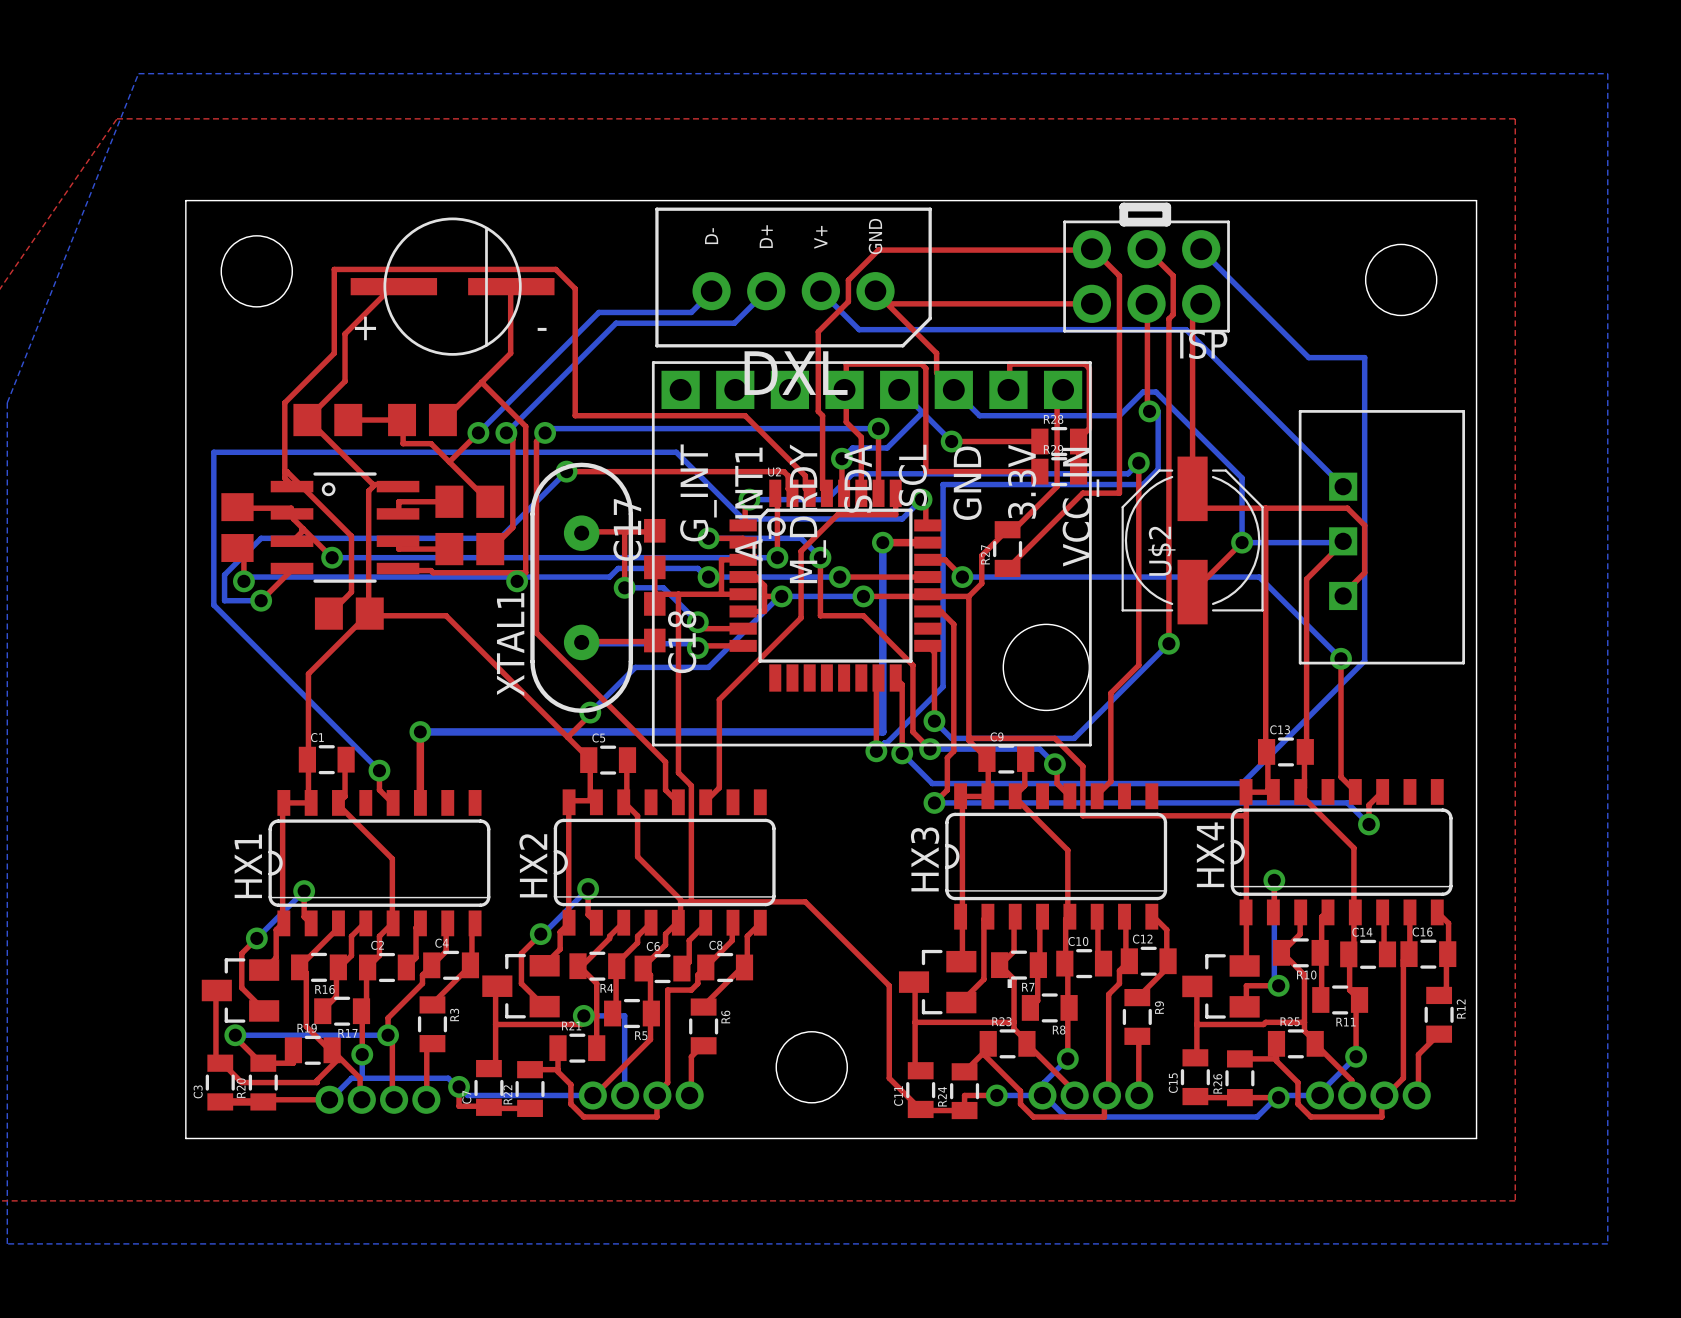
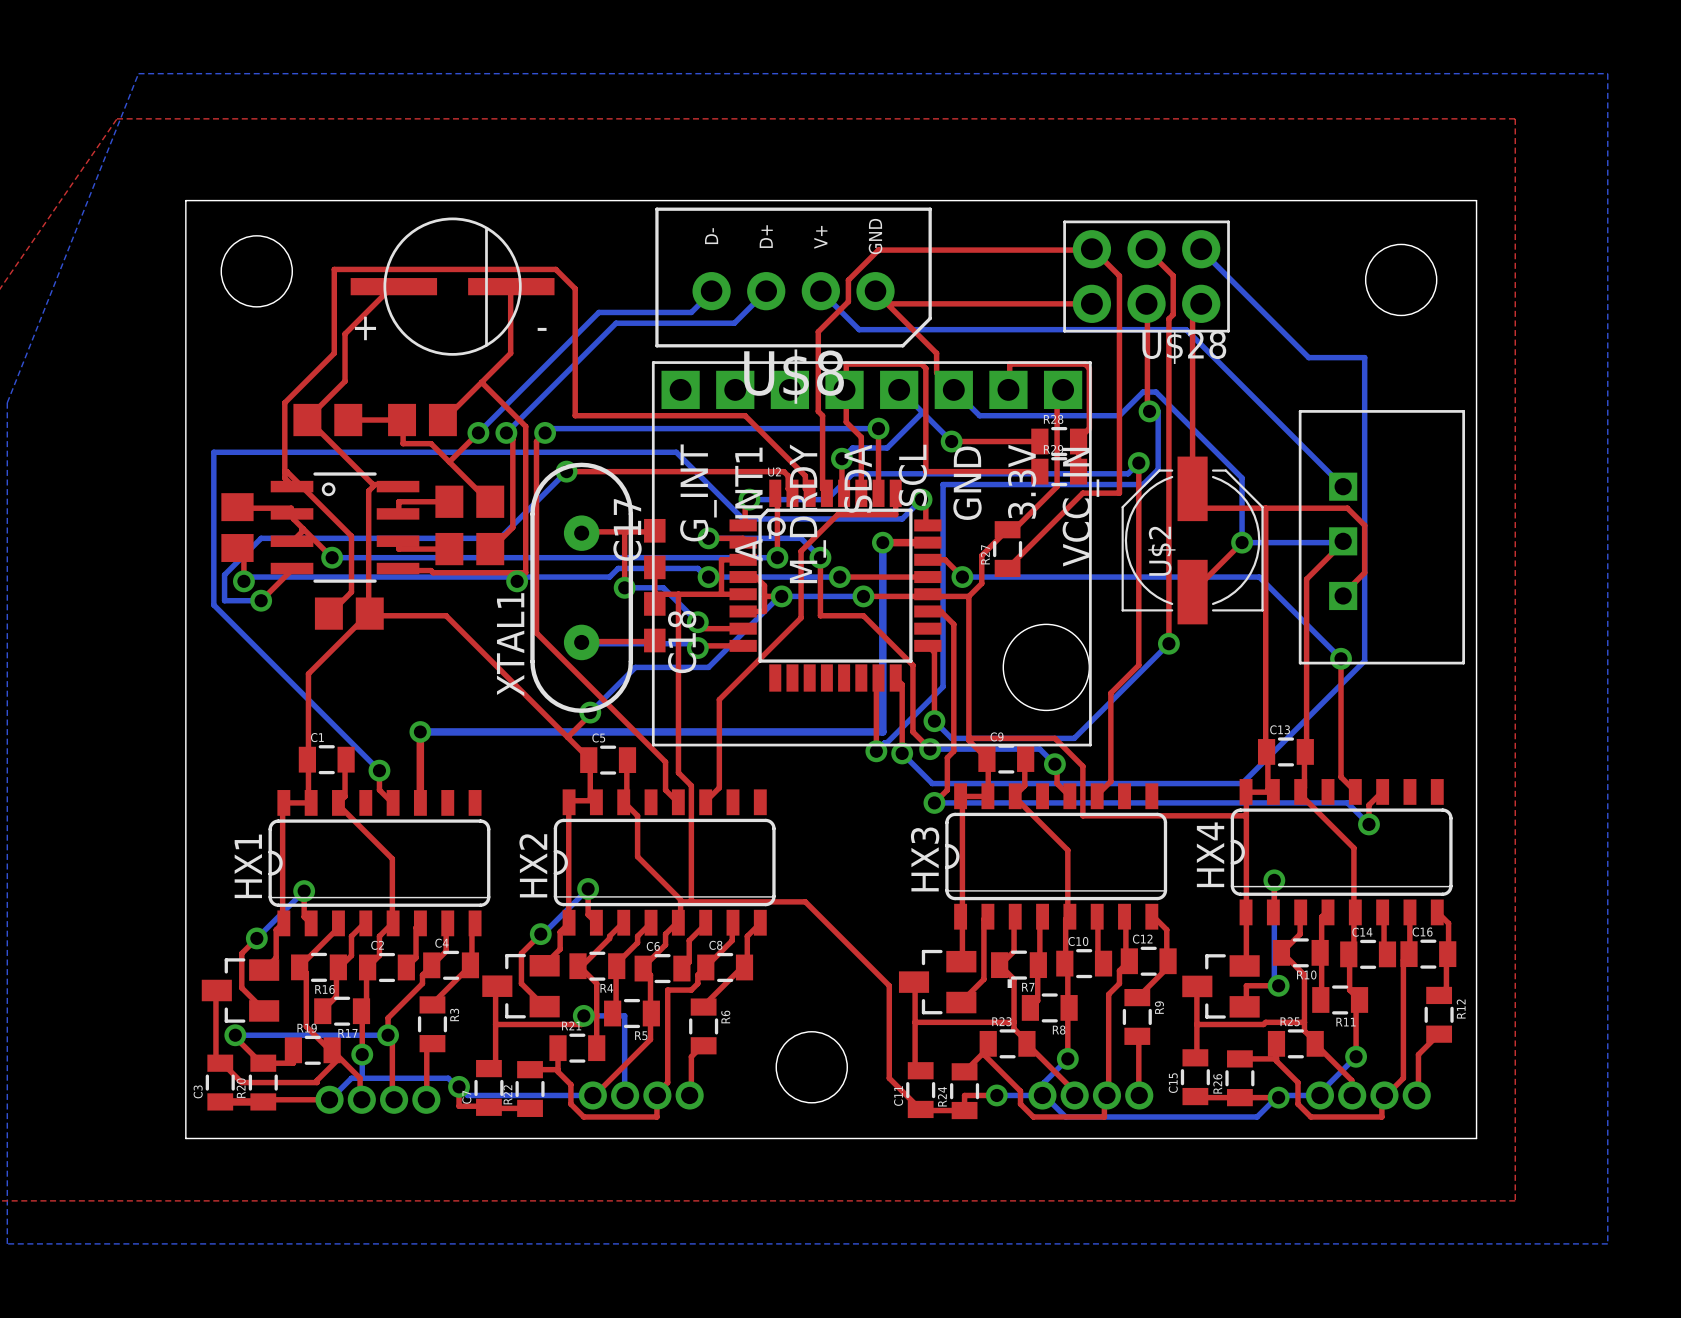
line: (1123, 207) (1123, 222) (1166, 222) (1166, 207) (1123, 207) -> none
ISP name: ISP (1203, 344) -> U$28 (1184, 347)
DXL name: DXL (796, 373) -> U$8 (794, 376)

